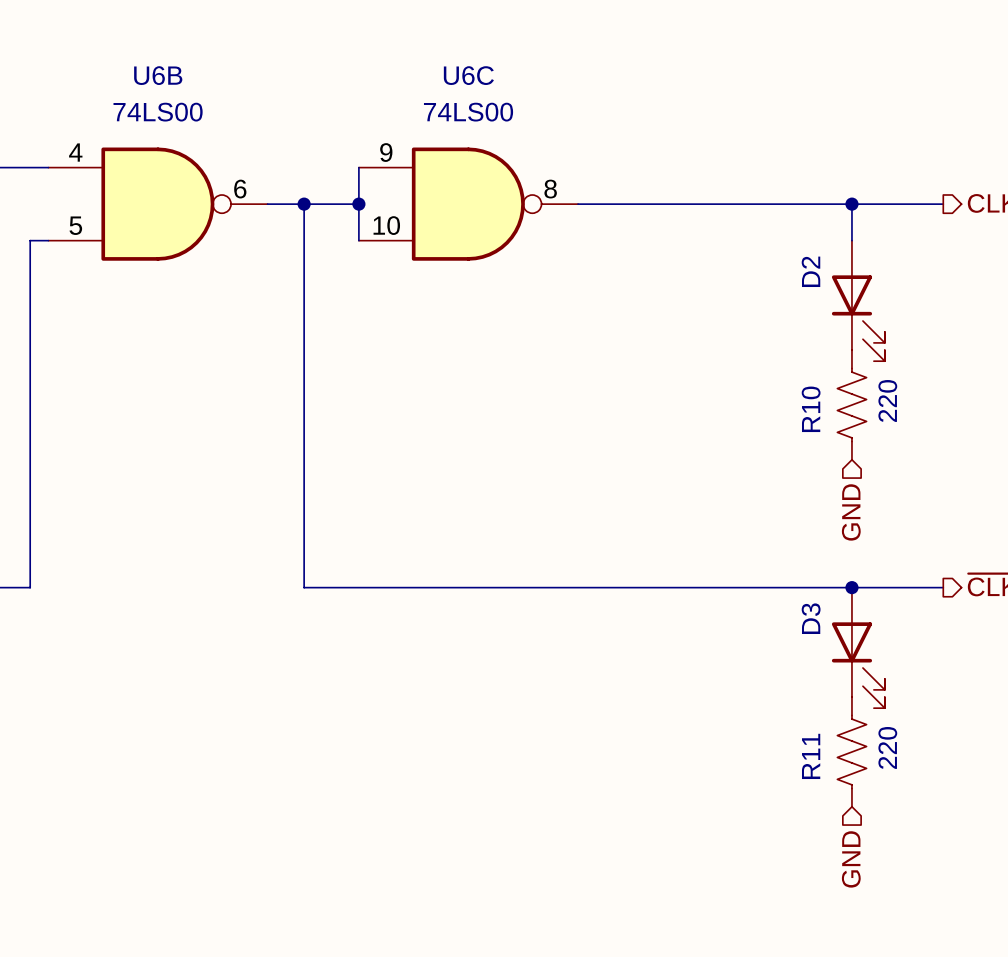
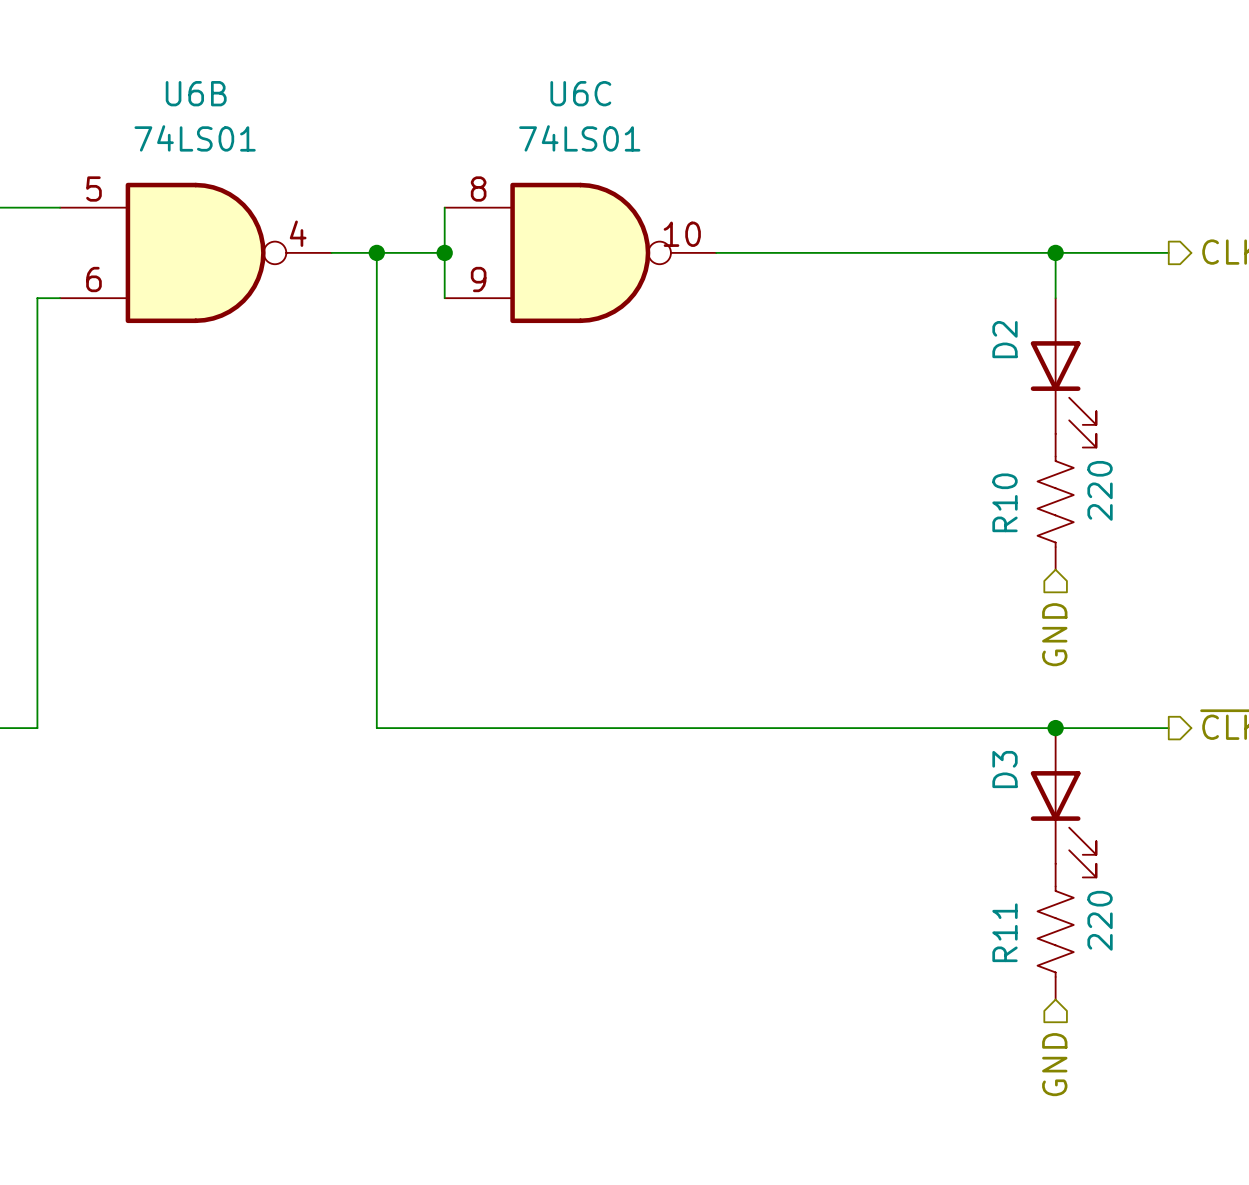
U6B value: 74LS00 (158, 112) -> 74LS01 (195, 138)
U6C value: 74LS00 (468, 112) -> 74LS01 (579, 138)
U6B pin number: 4 (75, 152) -> 5 (93, 189)
U6C pin number: 9 (386, 152) -> 8 (478, 189)
U6B pin number: 6 (240, 189) -> 4 (298, 233)
U6C pin number: 8 (550, 189) -> 10 (682, 234)
U6B pin number: 5 (75, 225) -> 6 (93, 279)
U6C pin number: 10 (386, 225) -> 9 (478, 279)

